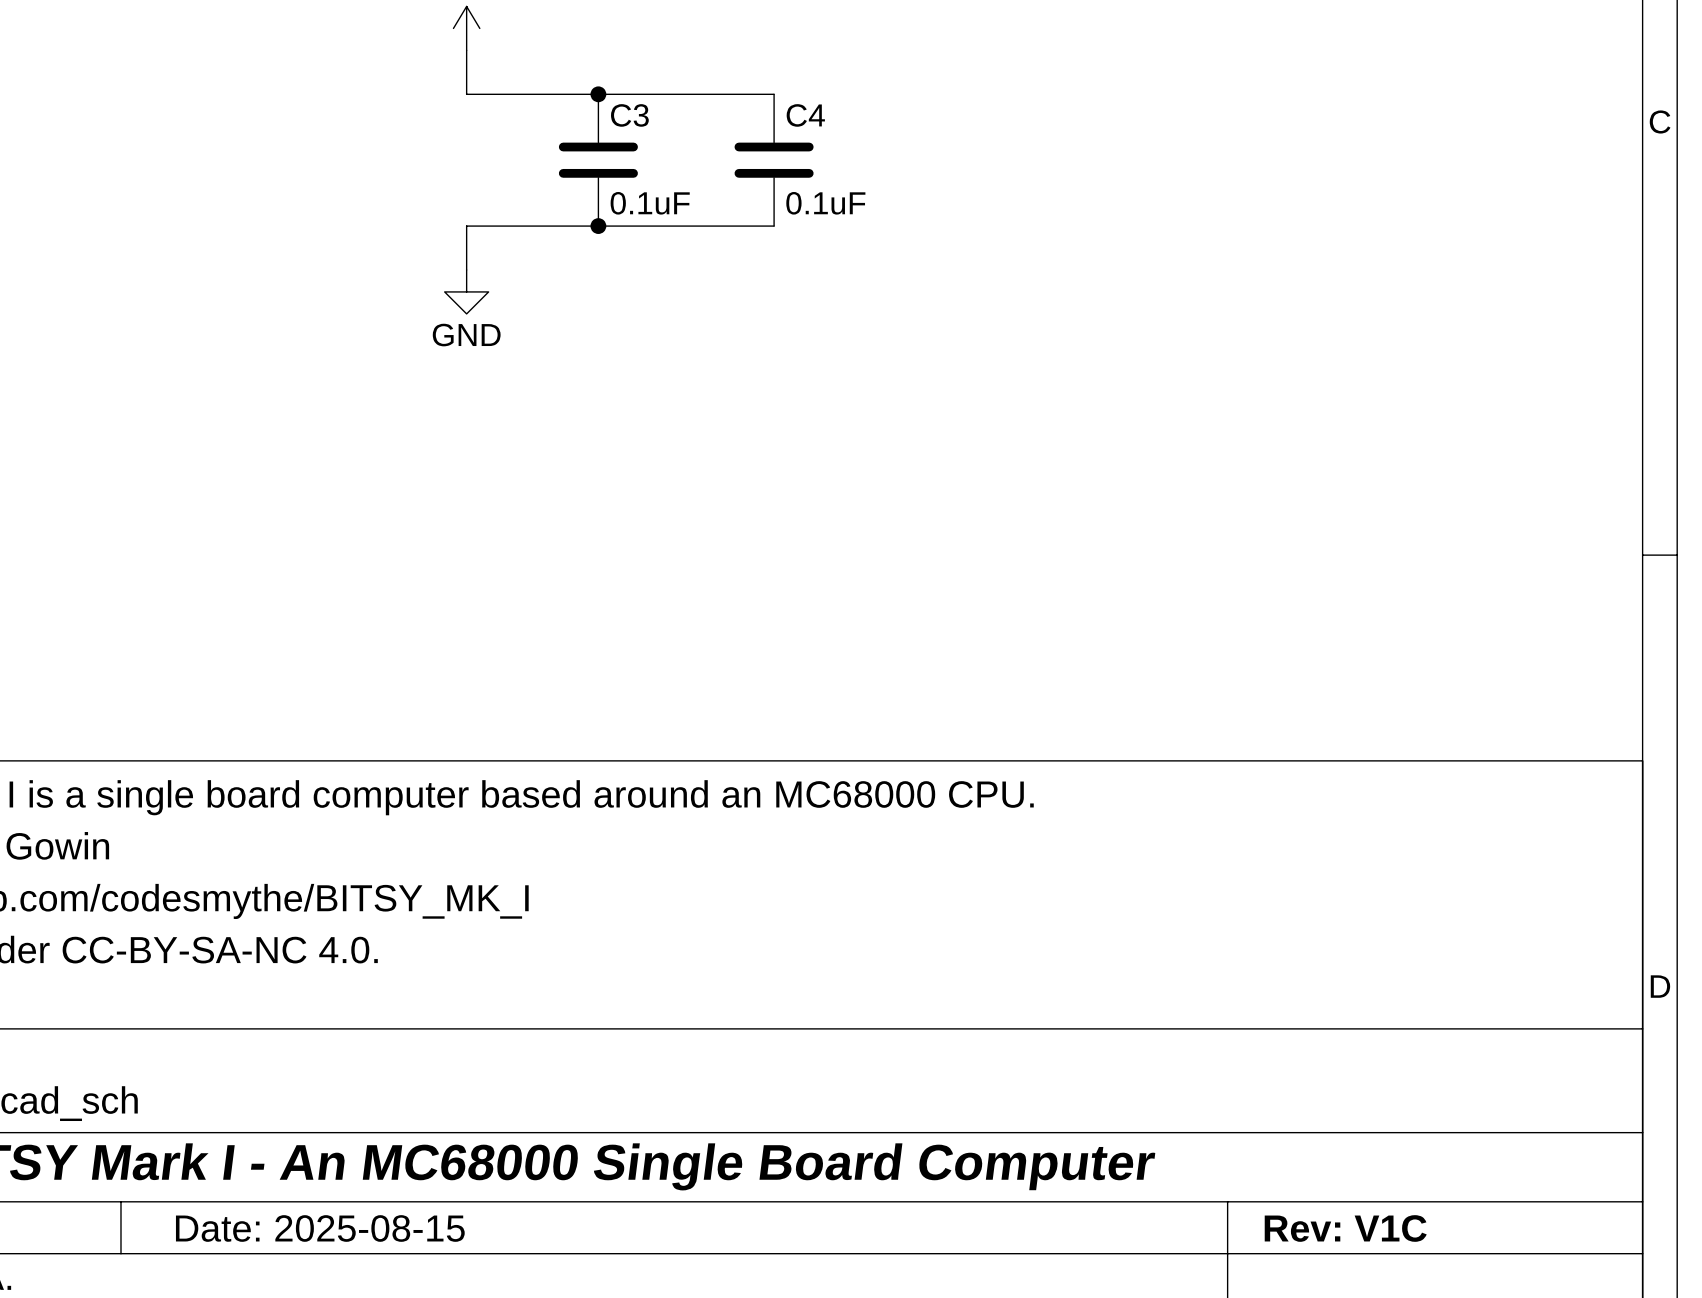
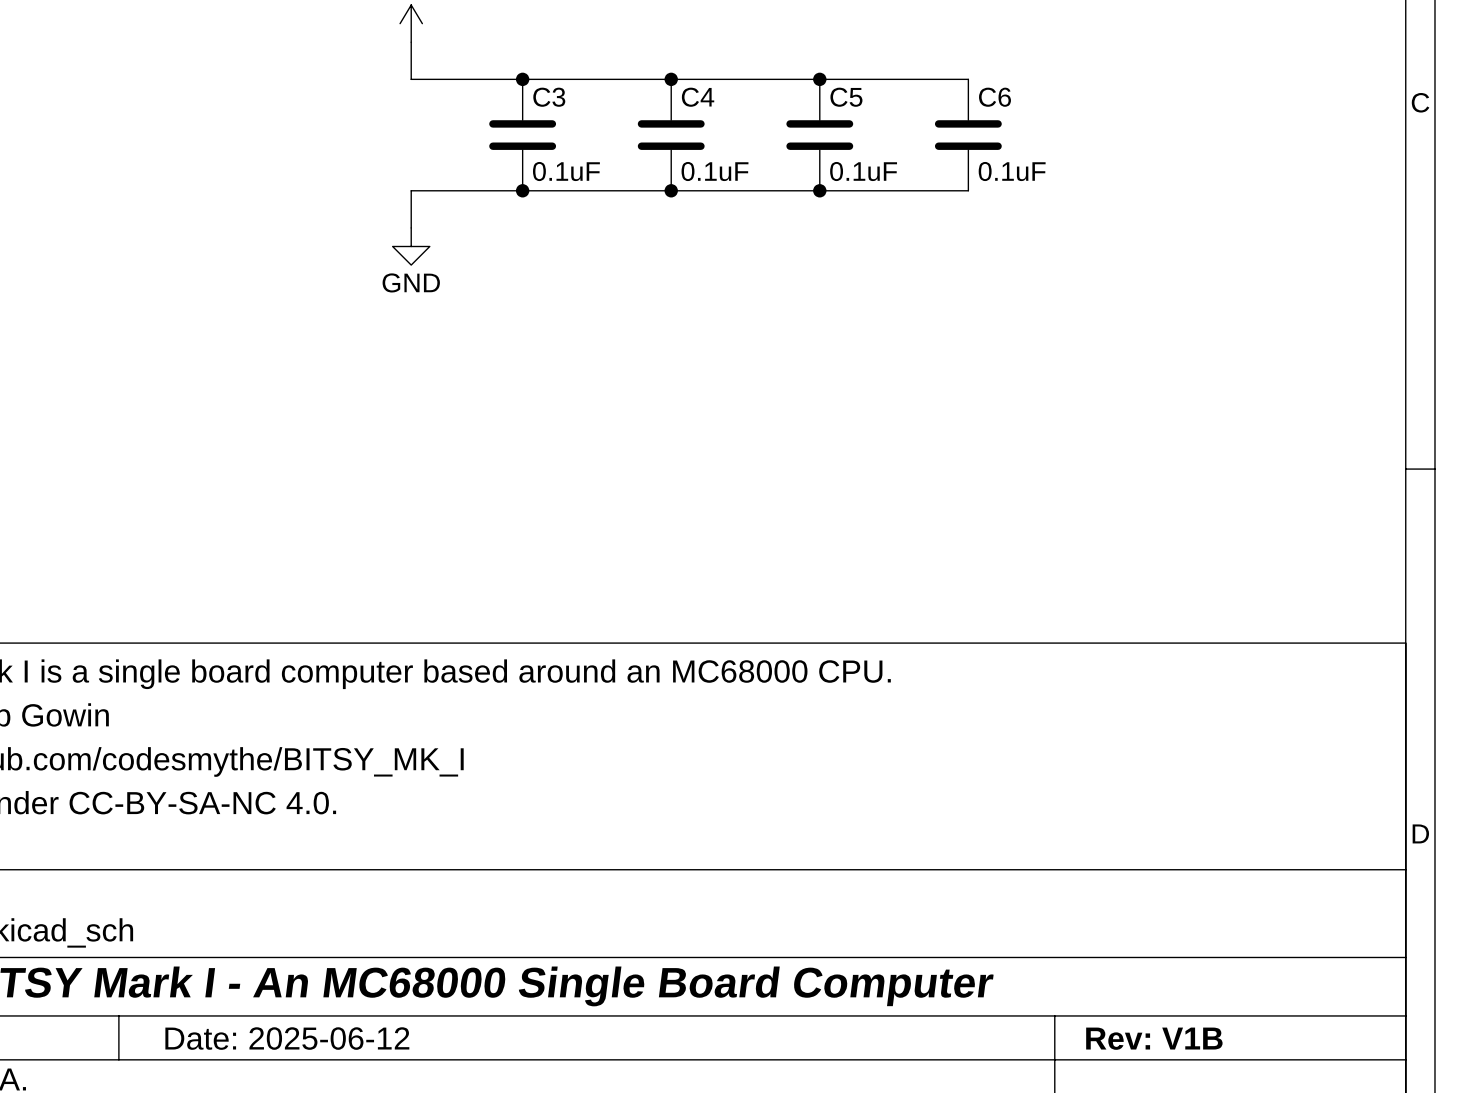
wire: none -> (671, 79) (968, 79)
junction: none -> (671, 79)
junction: none -> (819, 79)
C5: none -> 0.1uF (819, 135)
C6: none -> 0.1uF (968, 135)
wire: none -> (671, 190) (968, 190)
junction: none -> (671, 190)
junction: none -> (819, 190)
title block: Date: 2025-08-15 (320, 1228) -> Date: 2025-06-12 (287, 1038)
title block: Rev: V1C (1345, 1228) -> Rev: V1B (1154, 1038)

